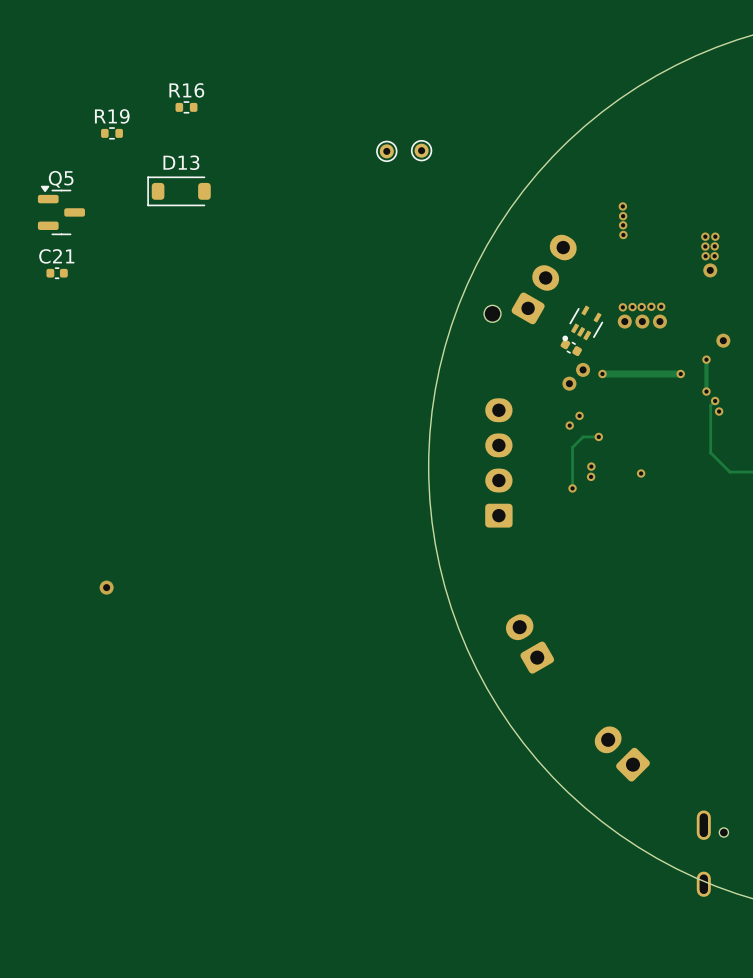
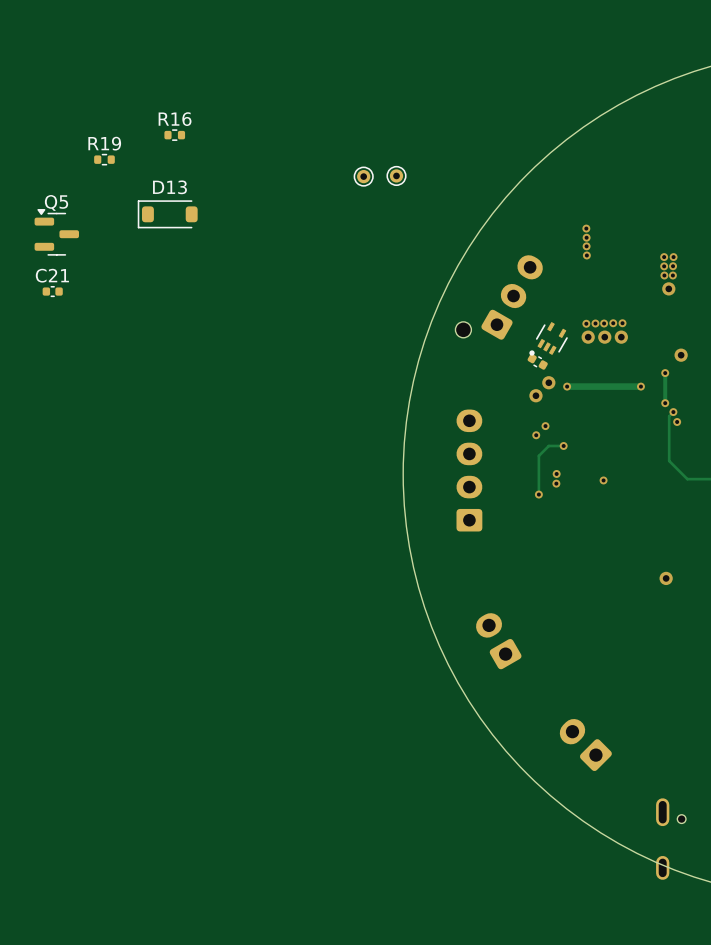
via: none -> (666, 578)
via: (106, 587) -> none

